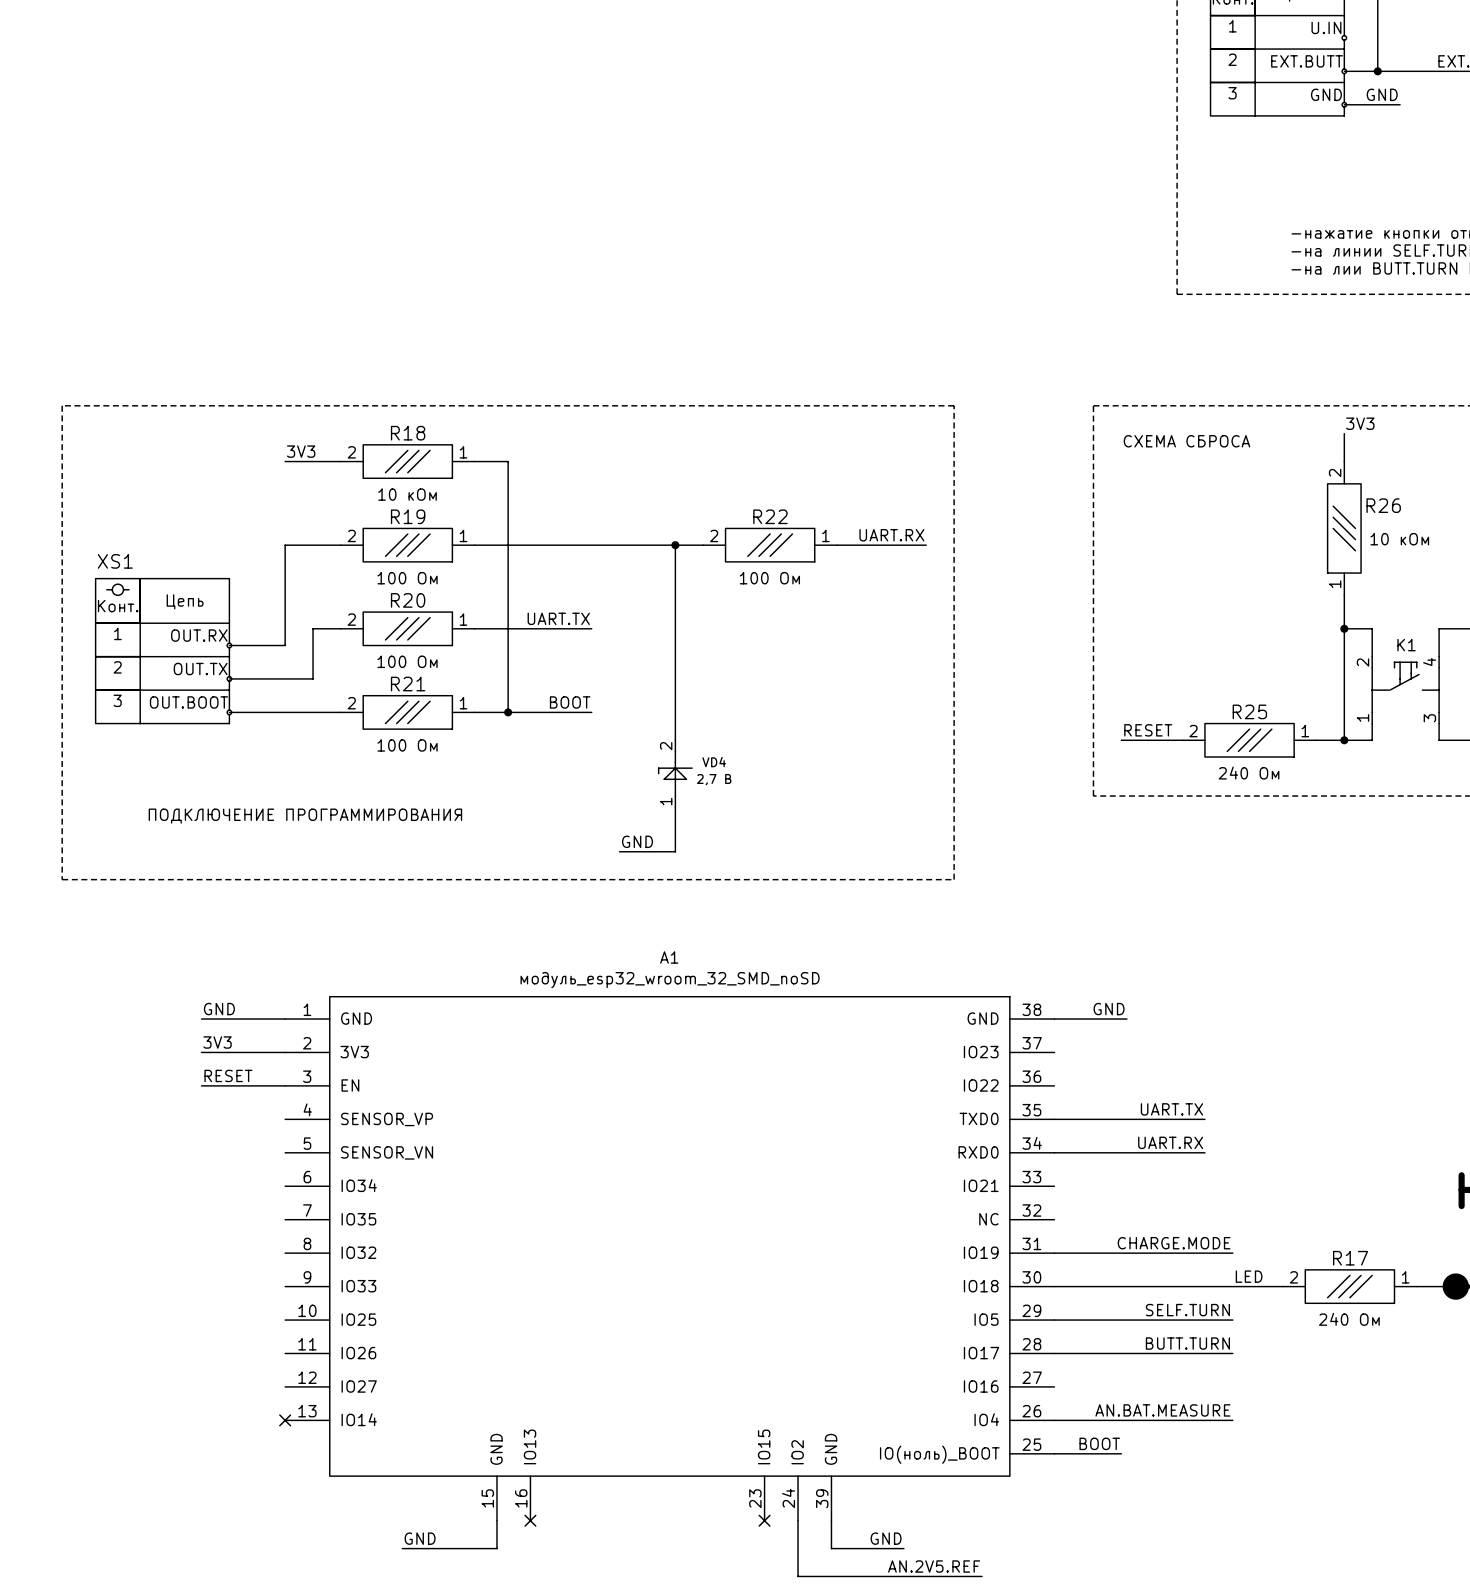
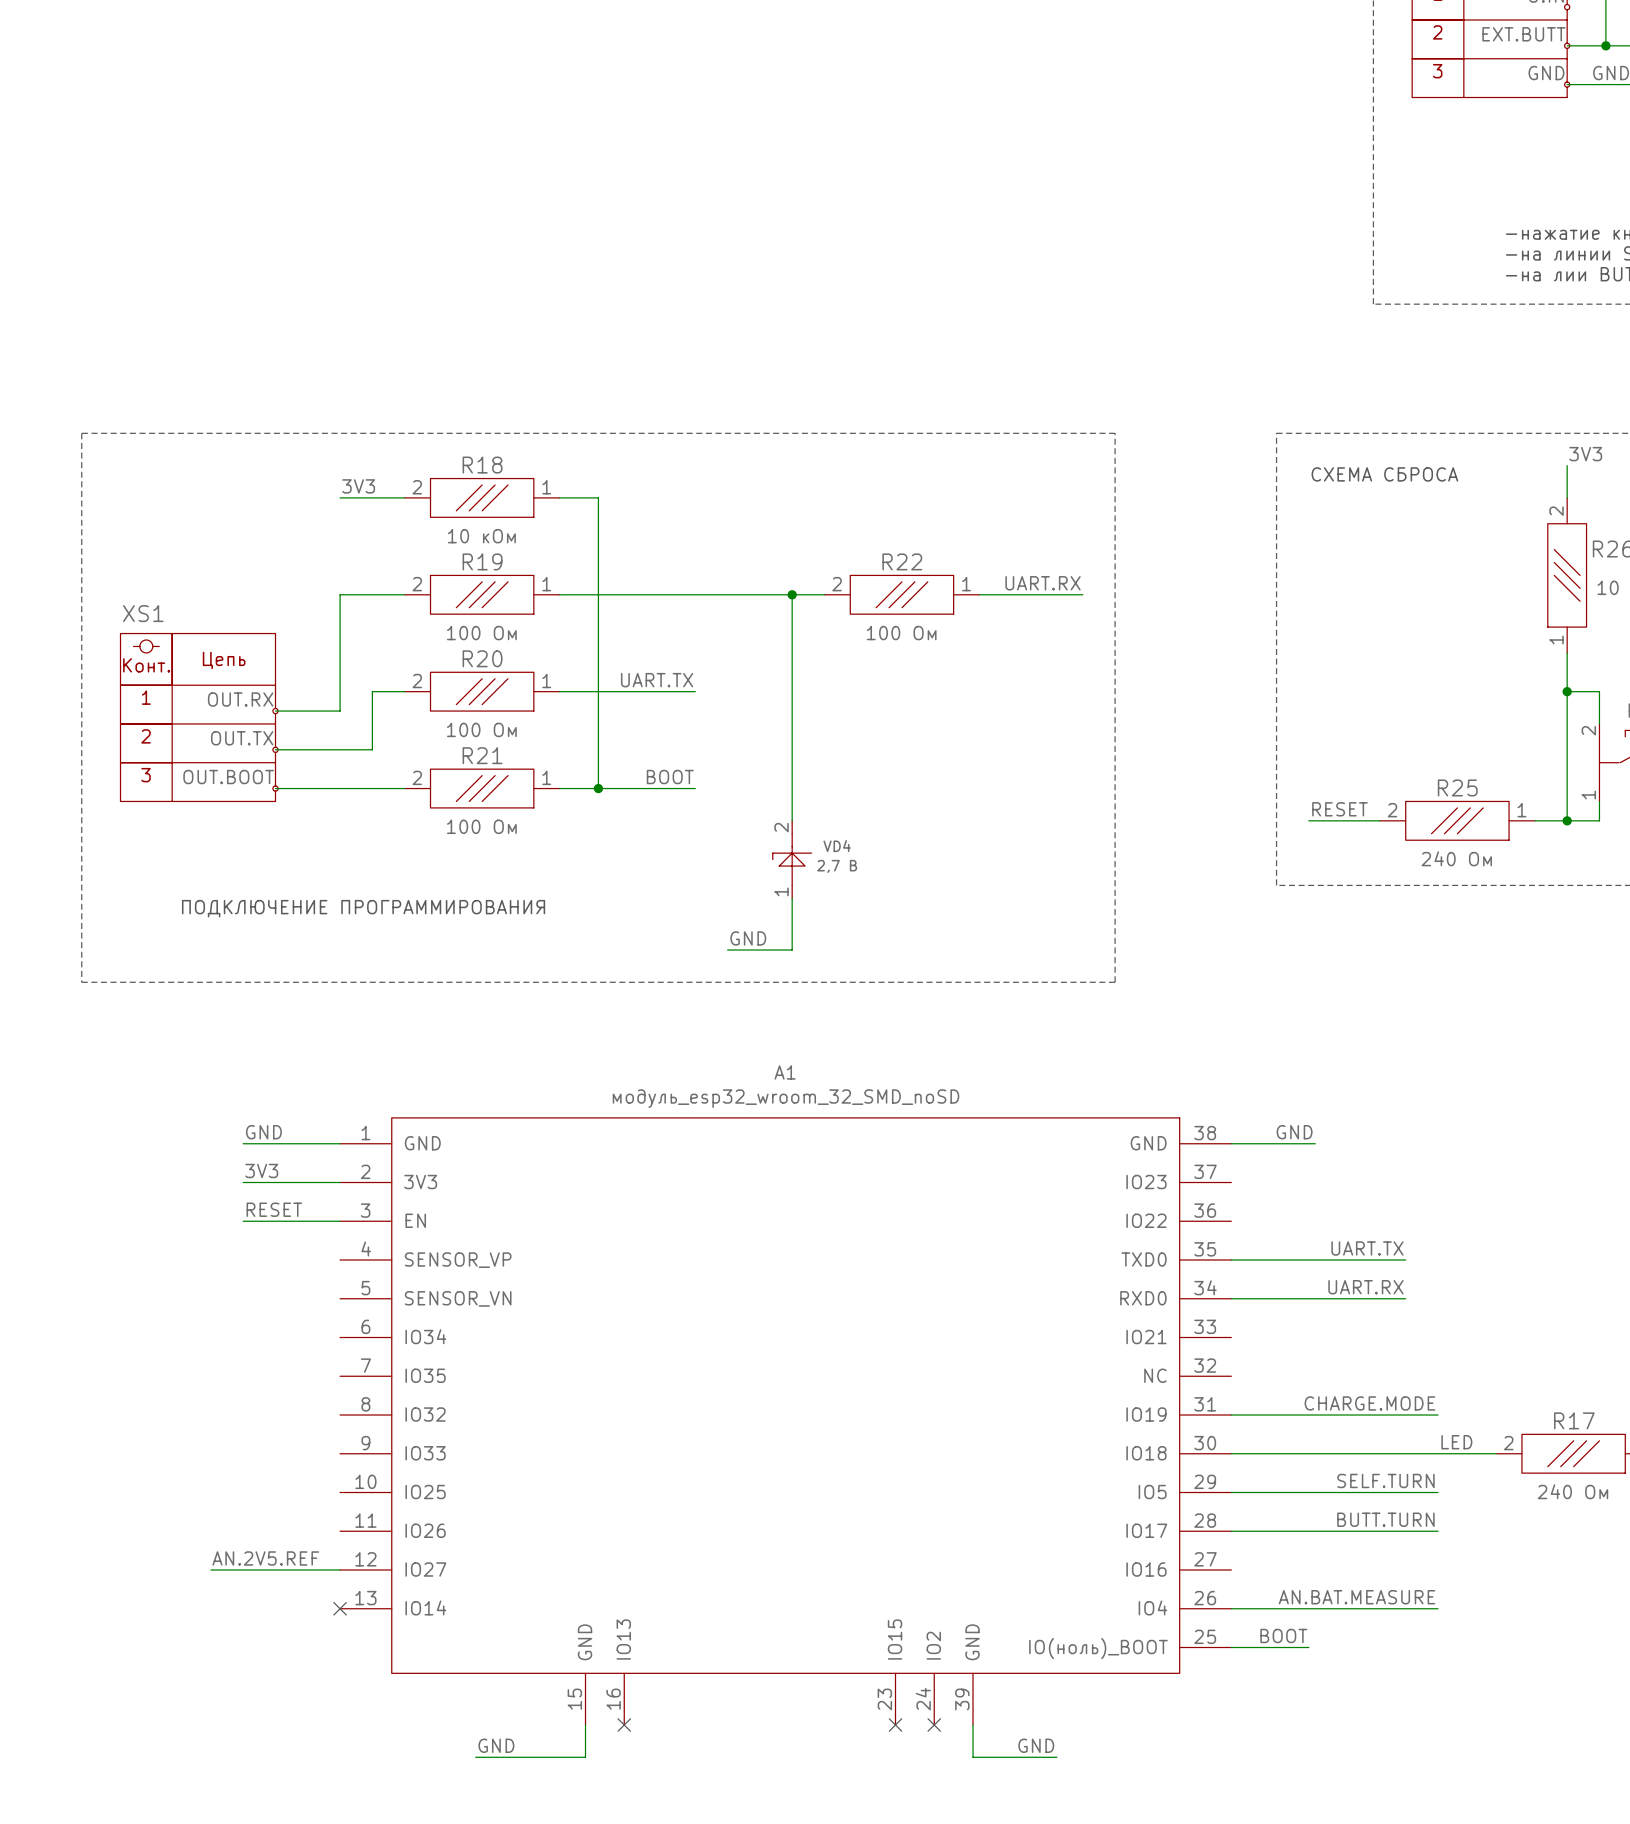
label: none -> AN.2V5.REF (265, 1558)
wire: none -> (210, 1570) (340, 1570)
wire: (798, 1520) (798, 1576) (981, 1576) -> none
no-connect mark: none -> (934, 1725)
label: AN.2V5.REF (934, 1566) -> none

